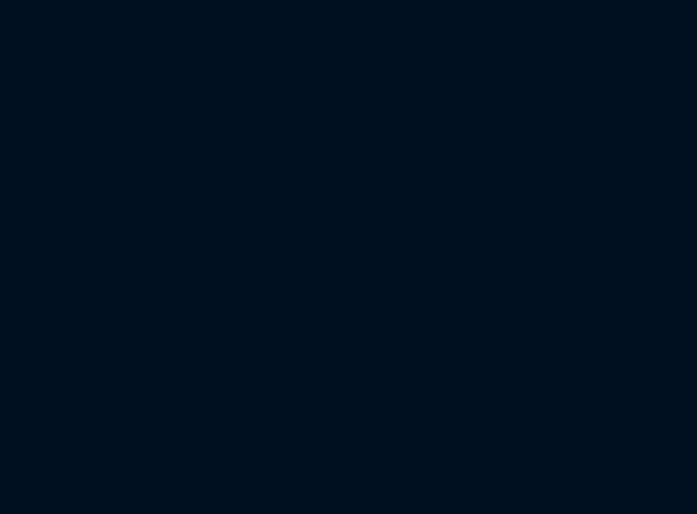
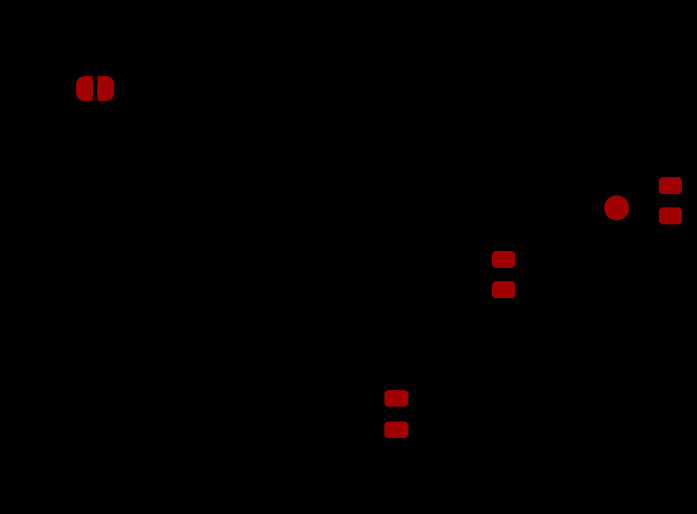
part: none -> (95, 88)
part: none -> (670, 200)
part: none -> (616, 207)
part: none -> (503, 274)
part: none -> (396, 414)

